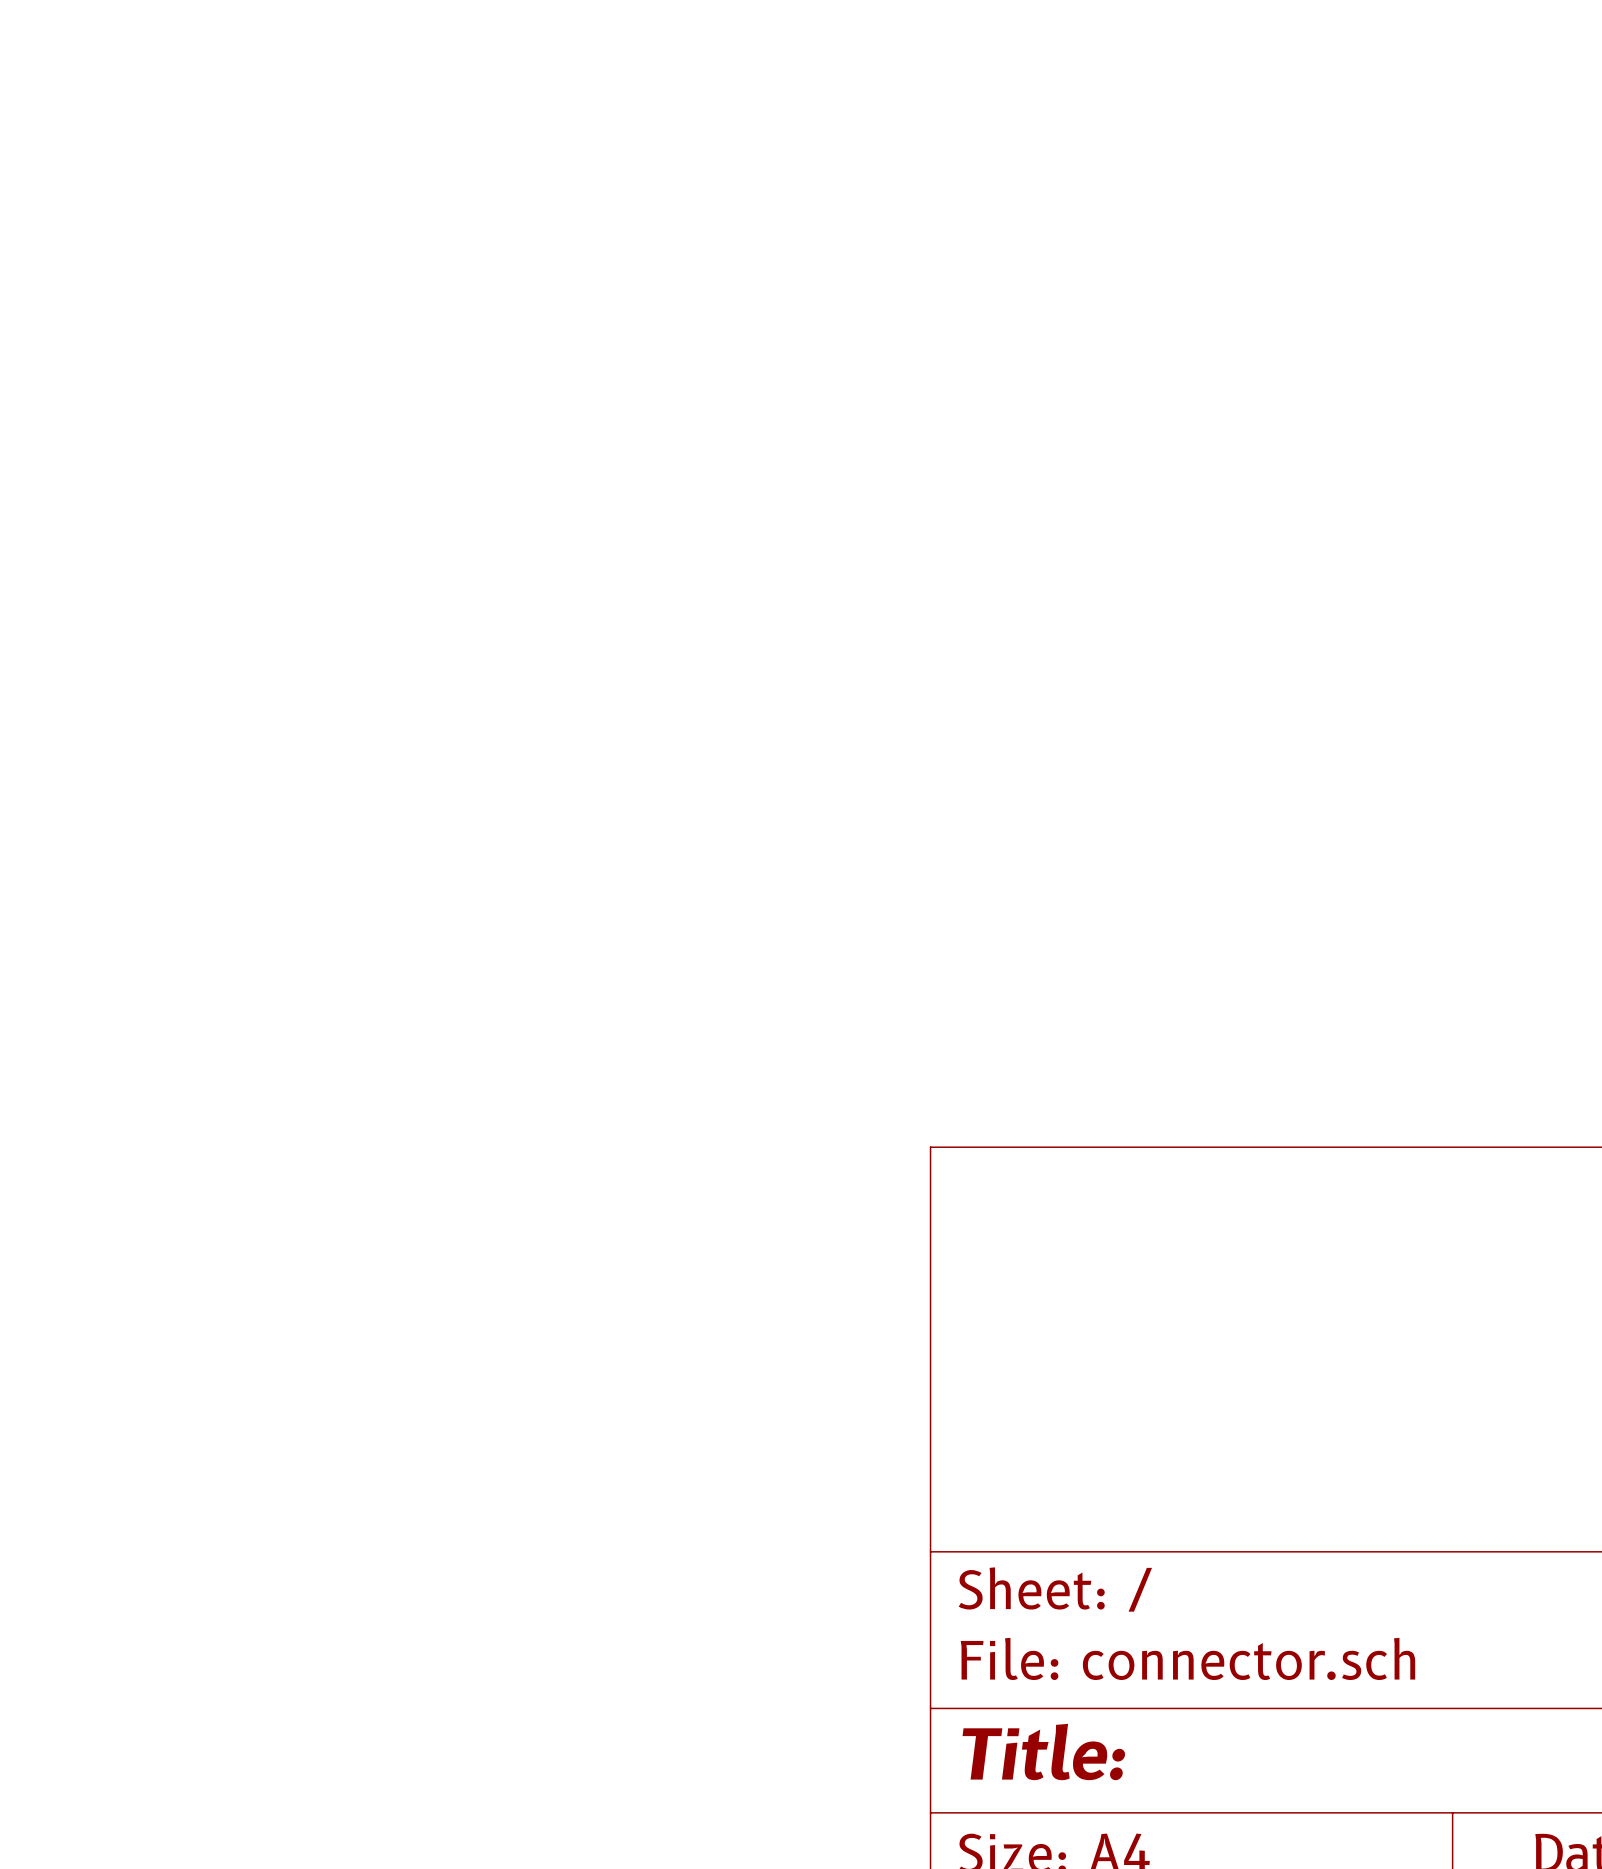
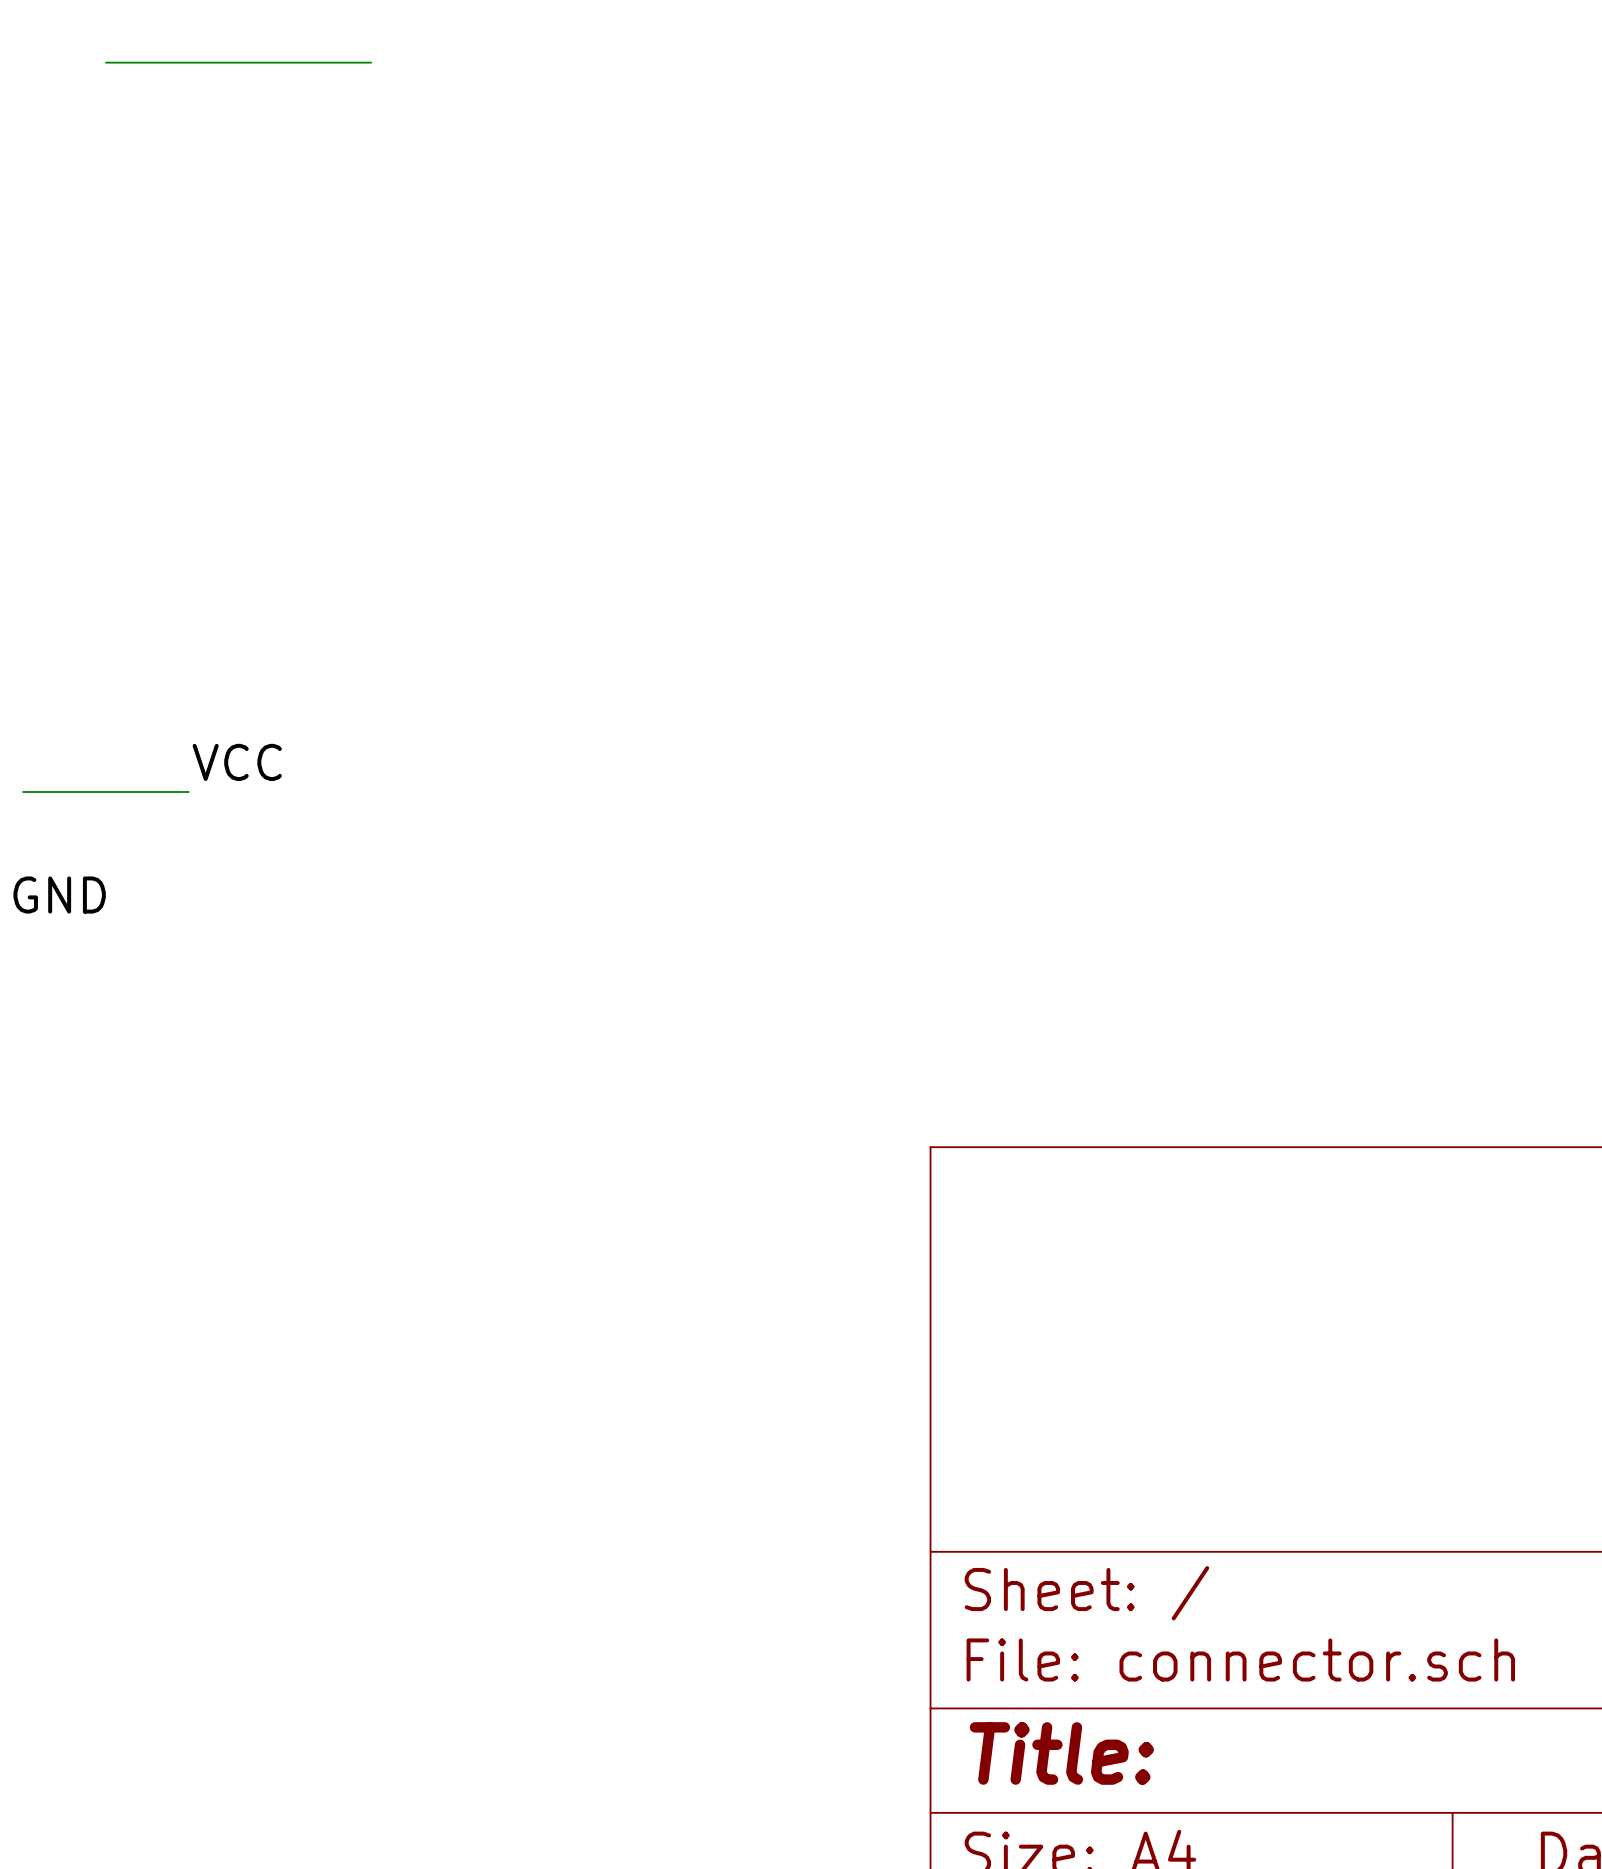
wire: none -> (105, 62) (371, 62)
label: none -> VCC (237, 762)
wire: none -> (23, 791) (188, 791)
label: none -> GND (59, 895)

